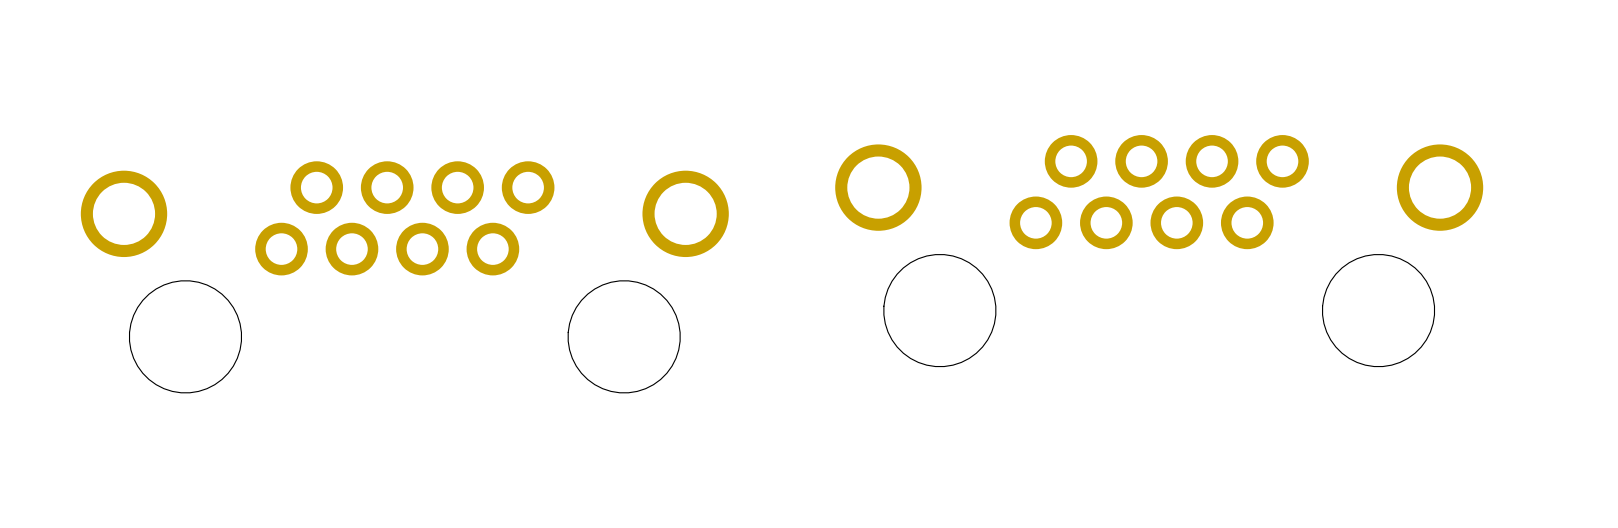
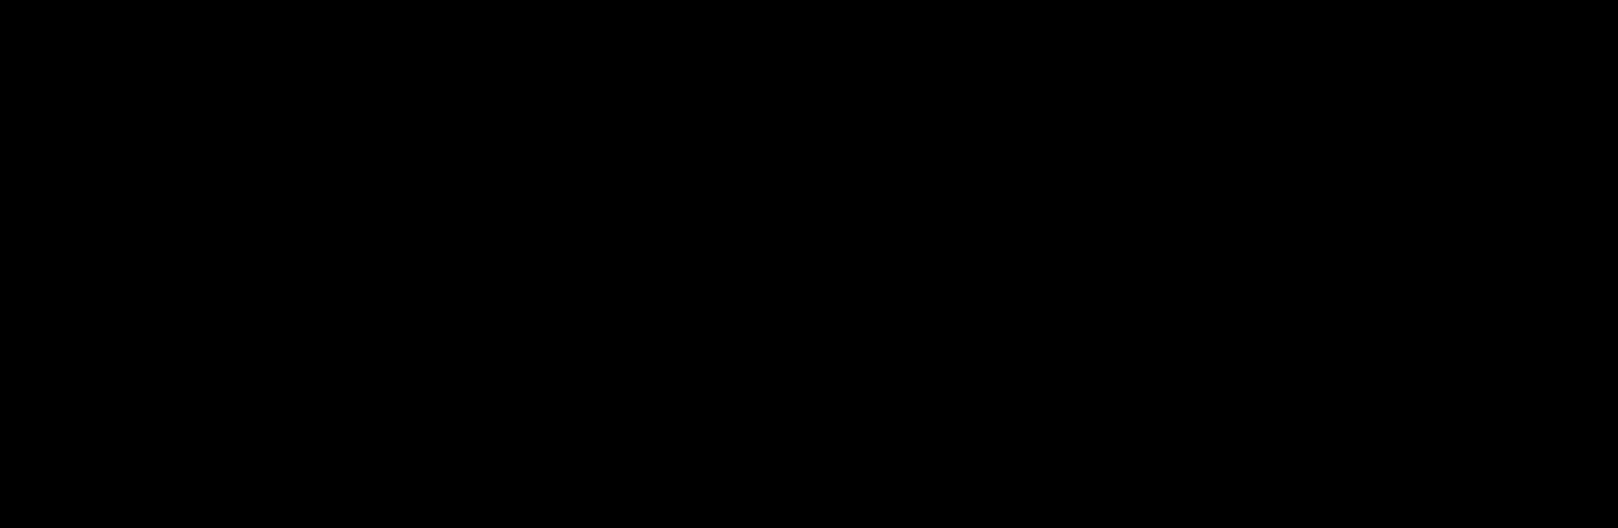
part: (1159, 250) -> none
part: (404, 277) -> none

